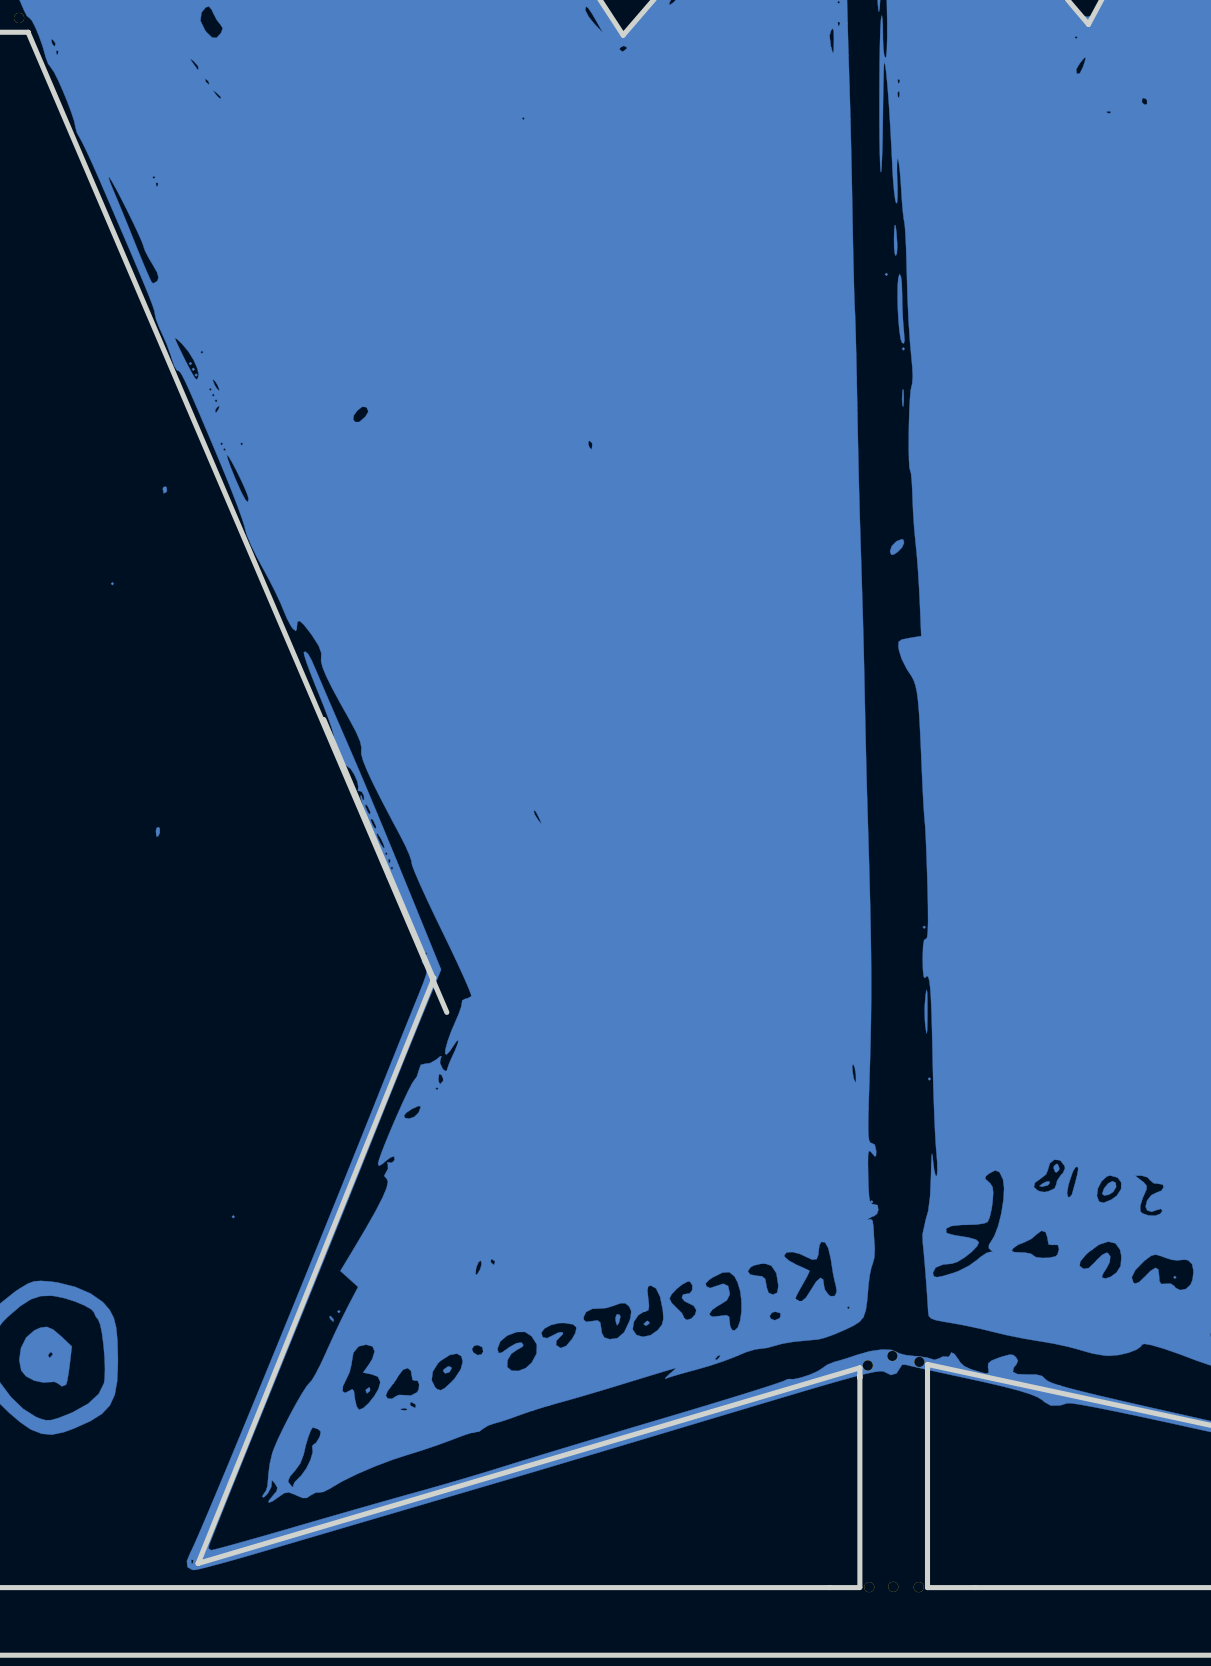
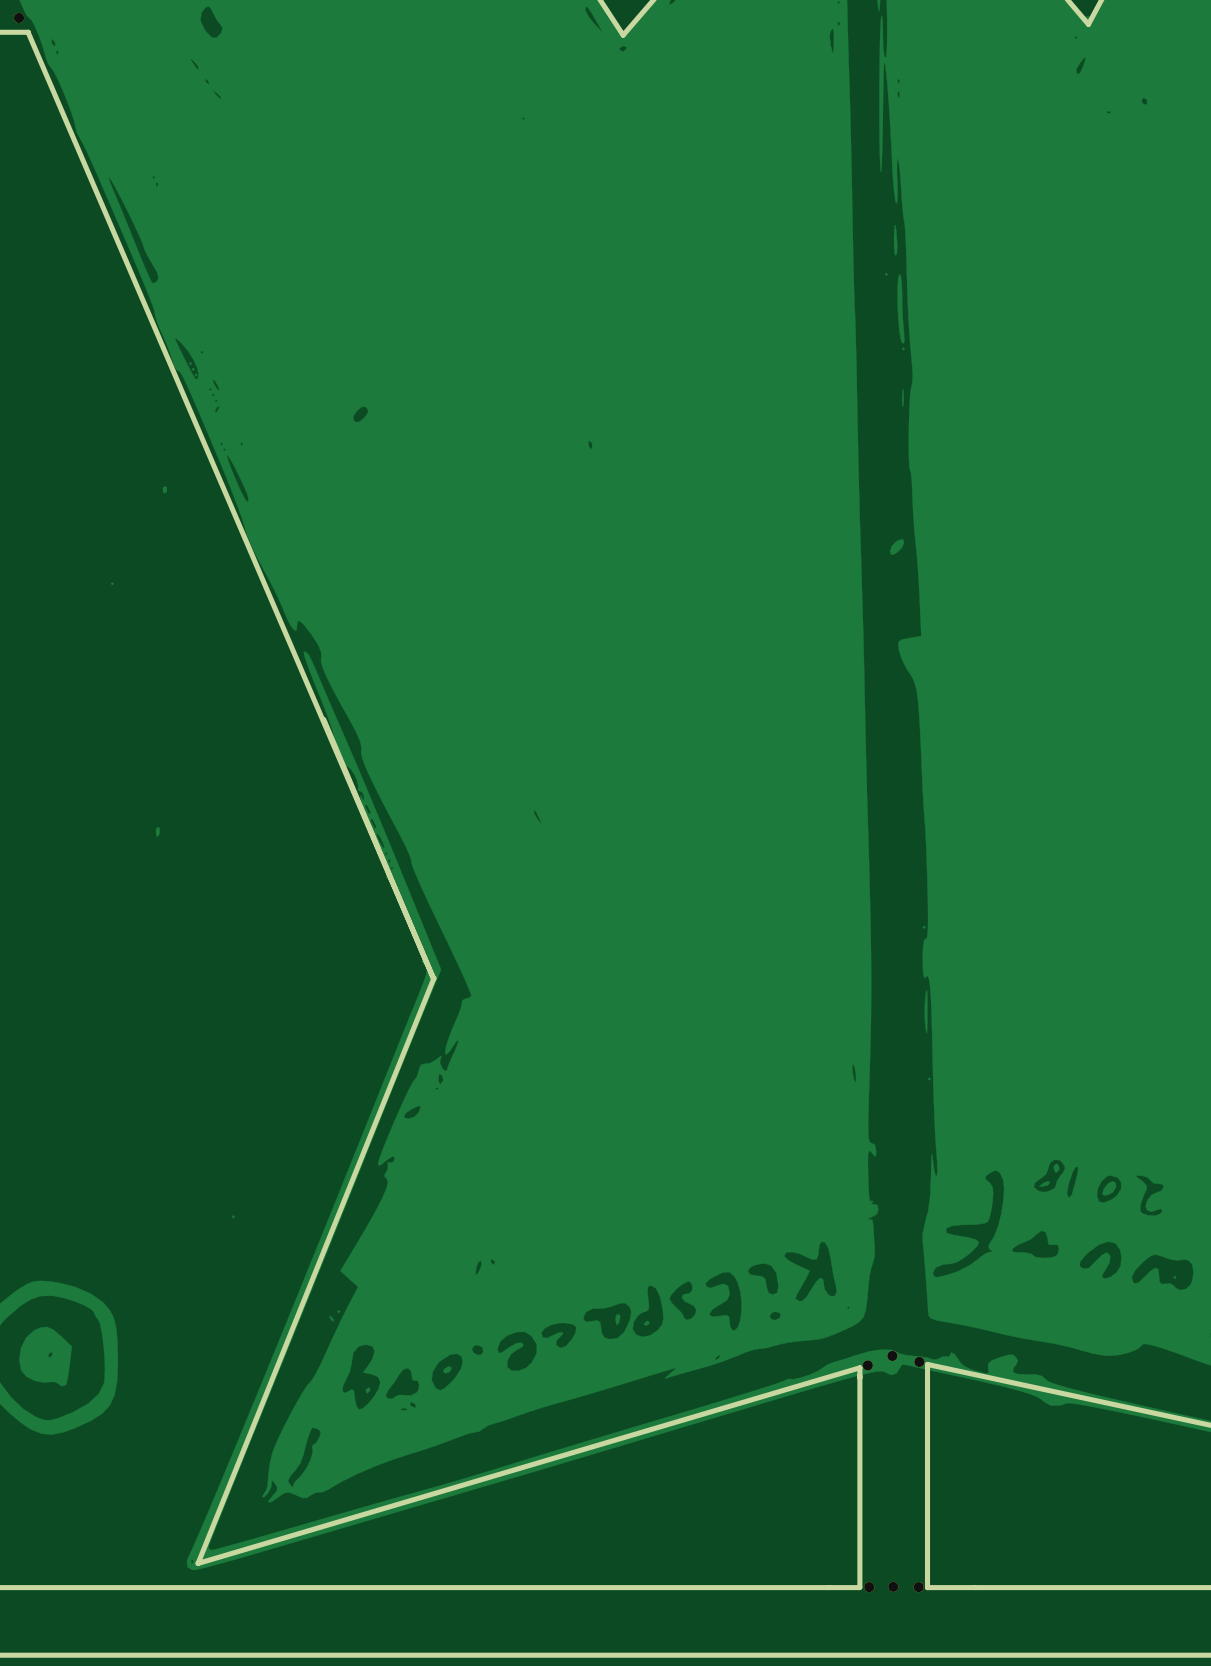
board edge: (28, 32) (446, 1012) -> (28, 32) (433, 978)

